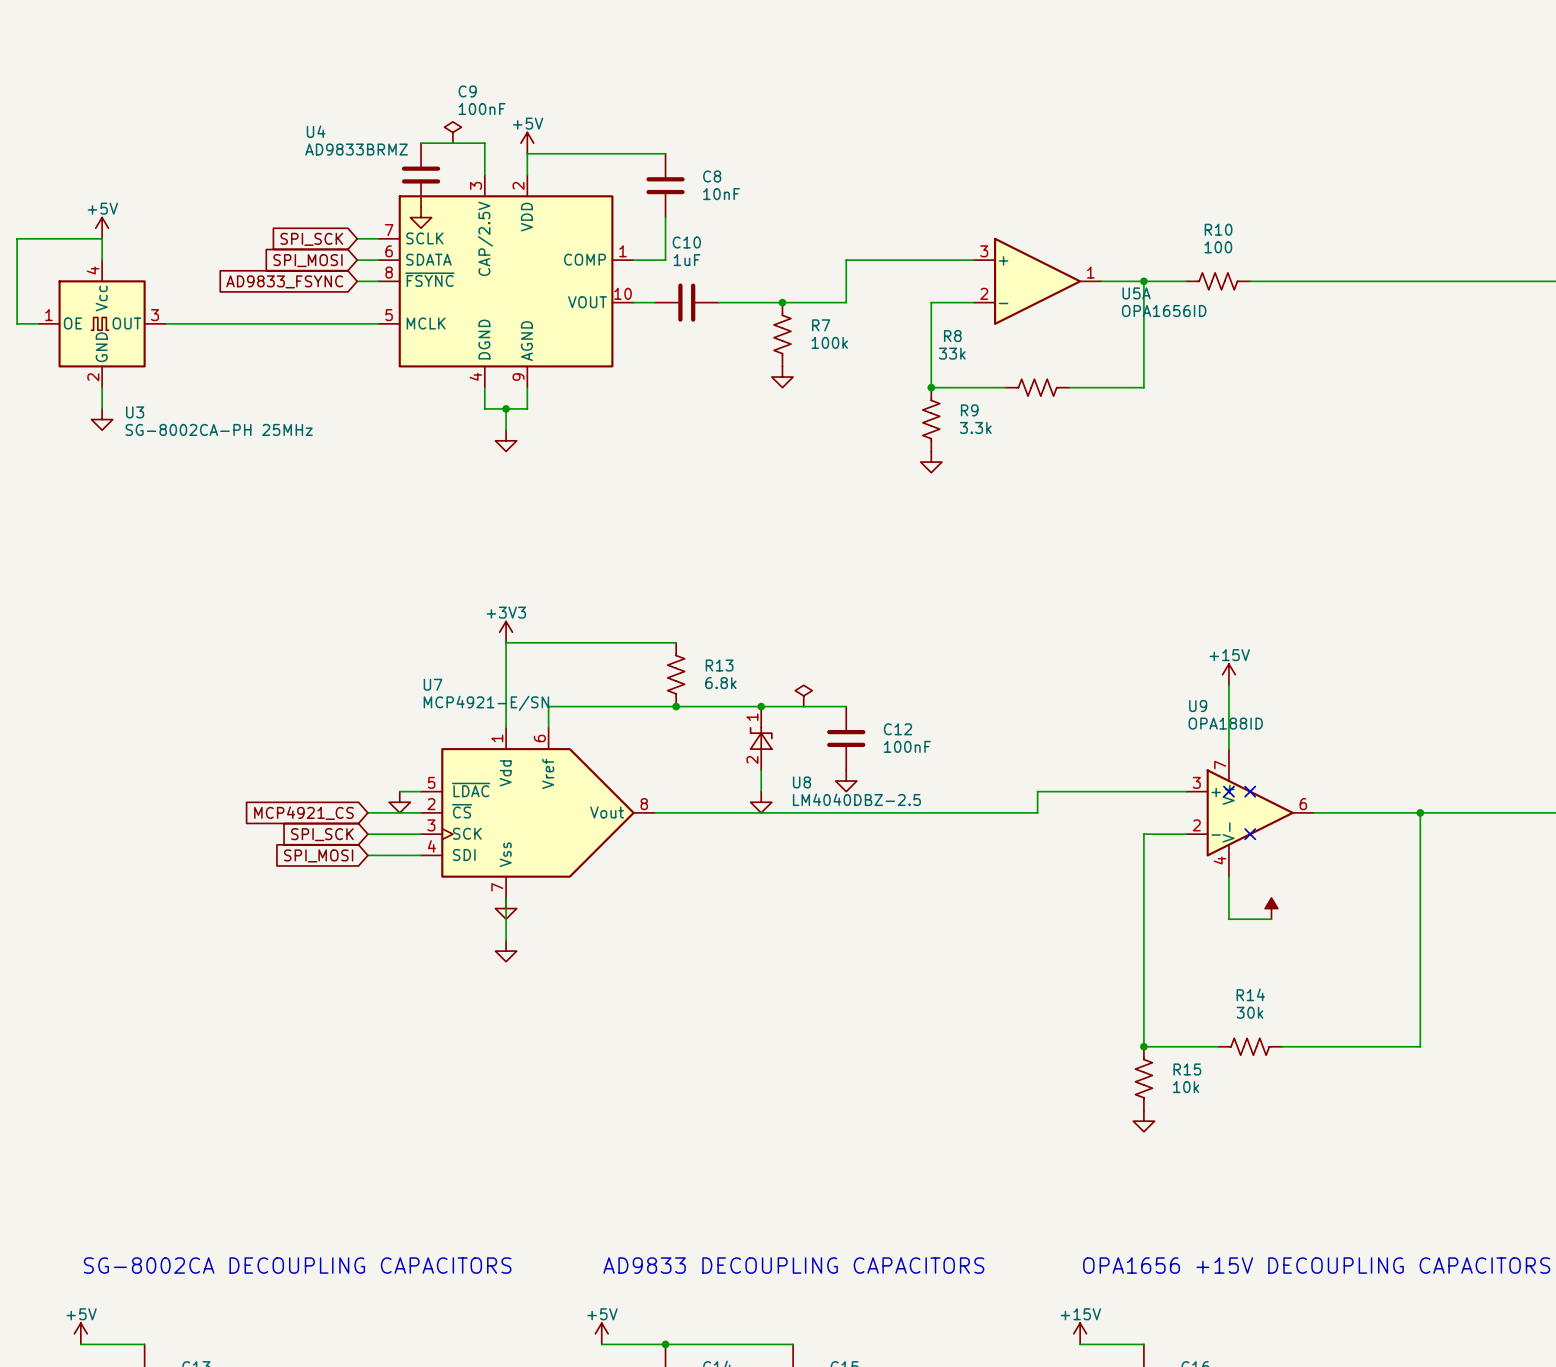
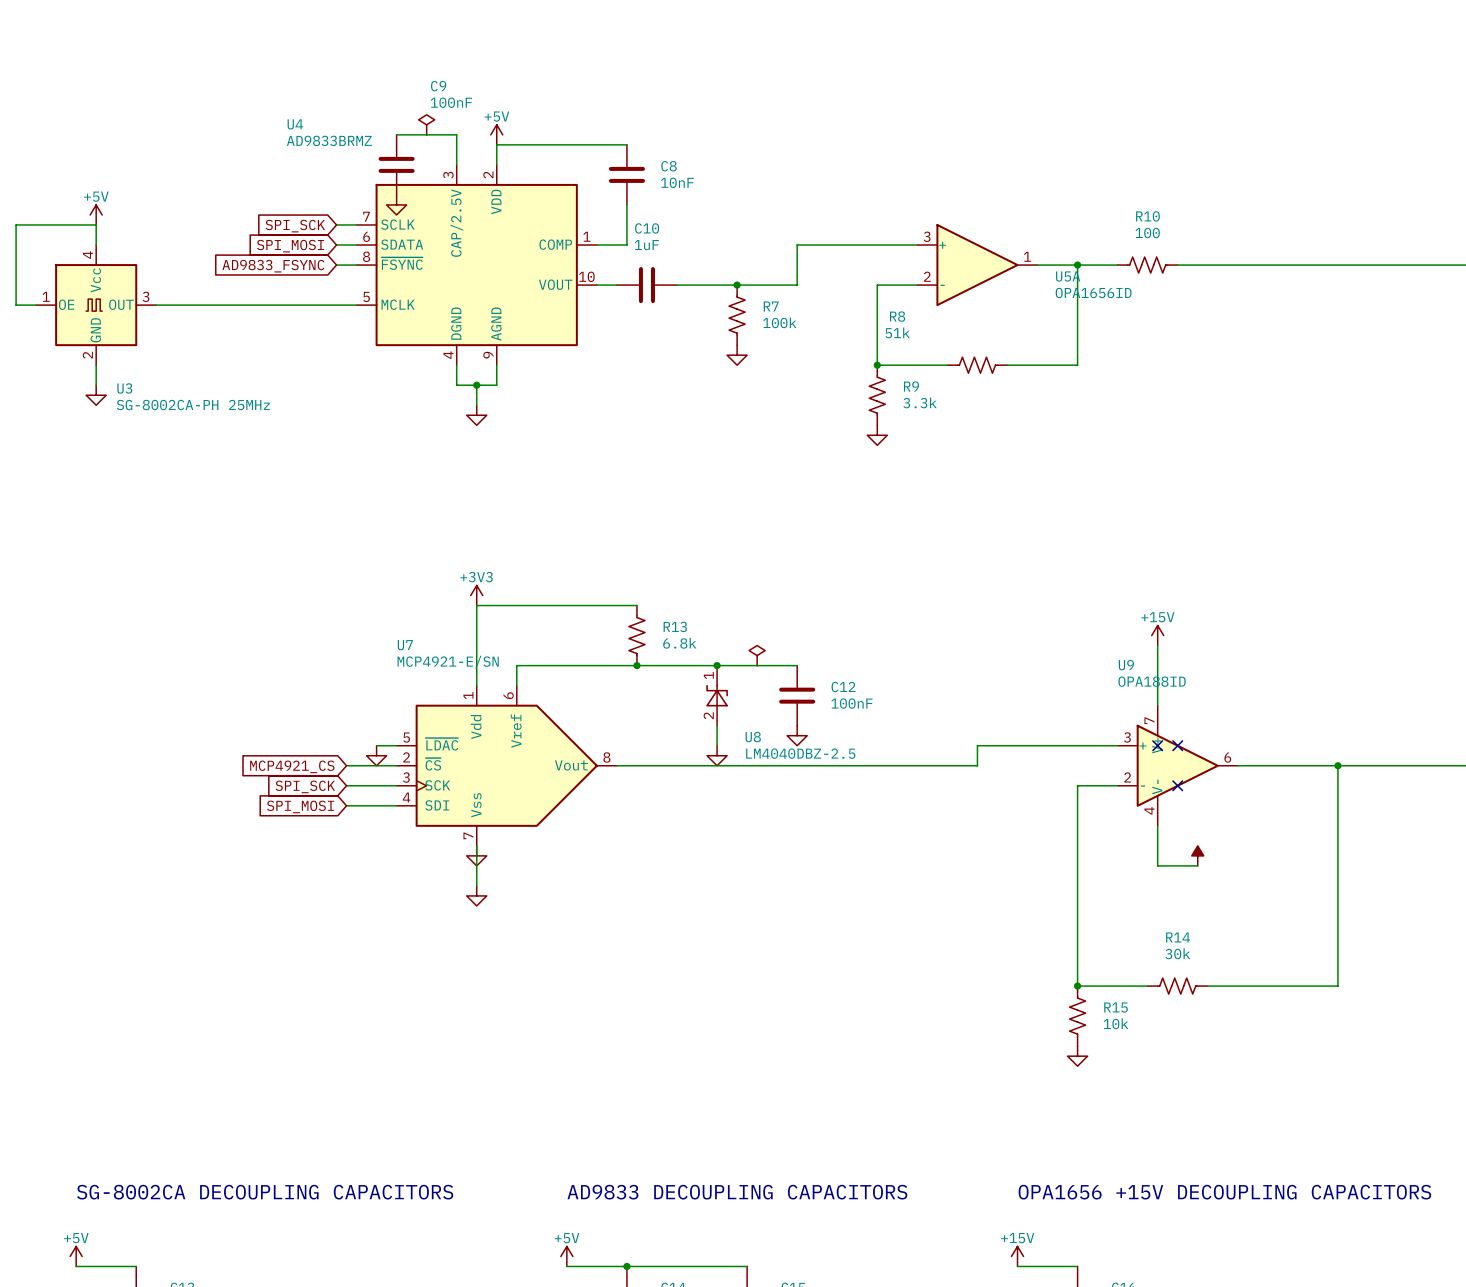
R8 value: 33k (952, 353) -> 51k (897, 332)

